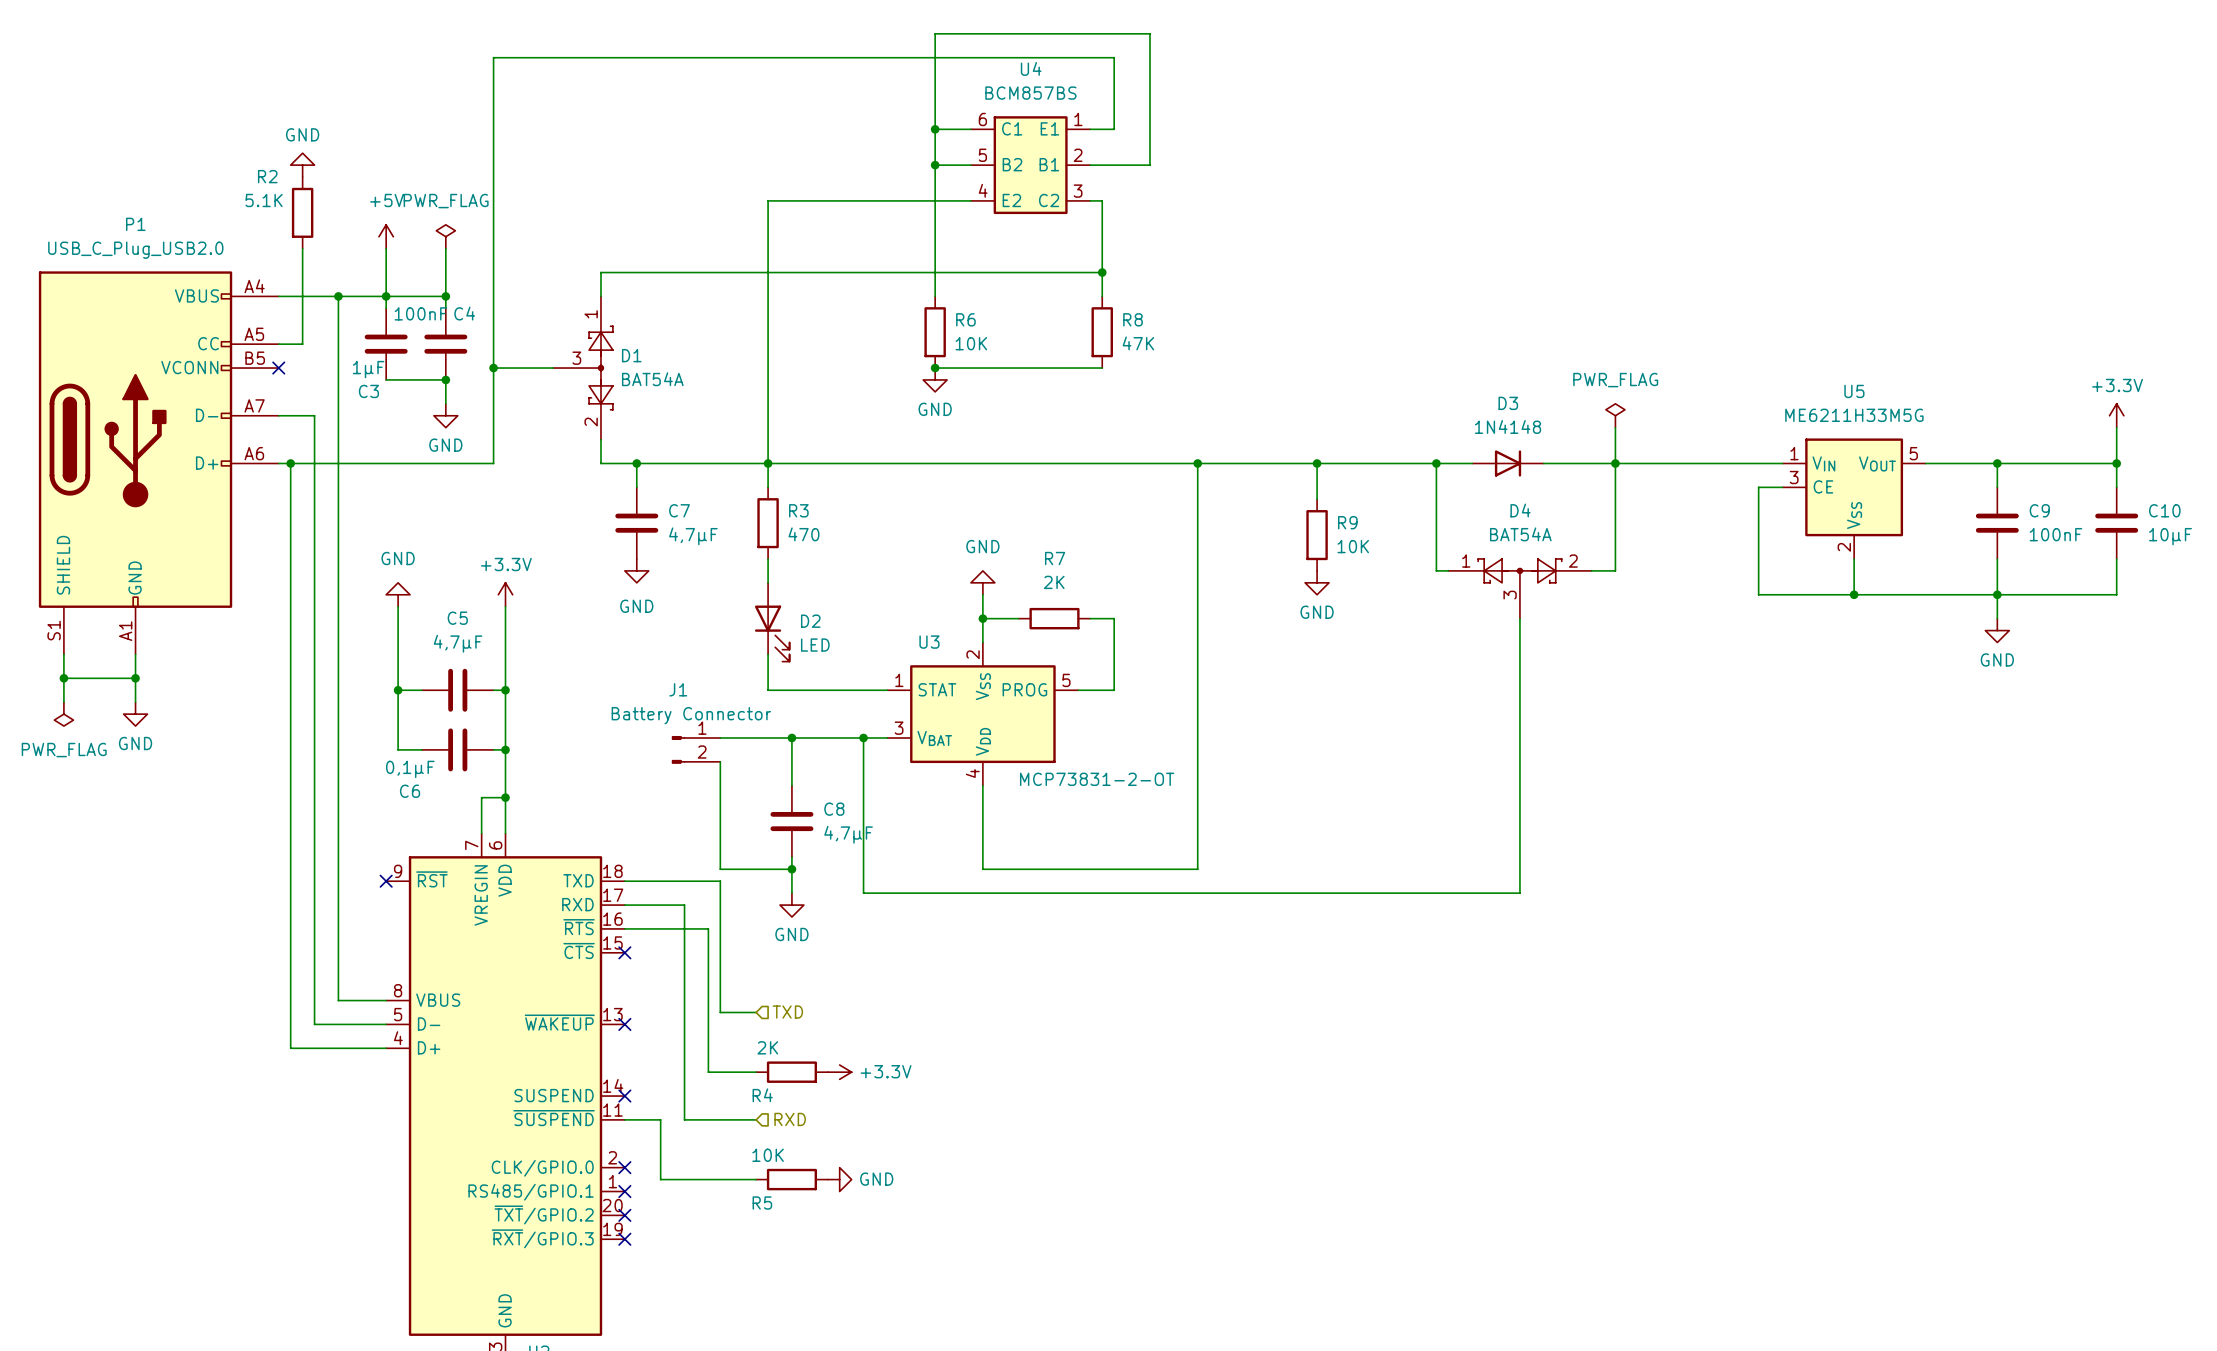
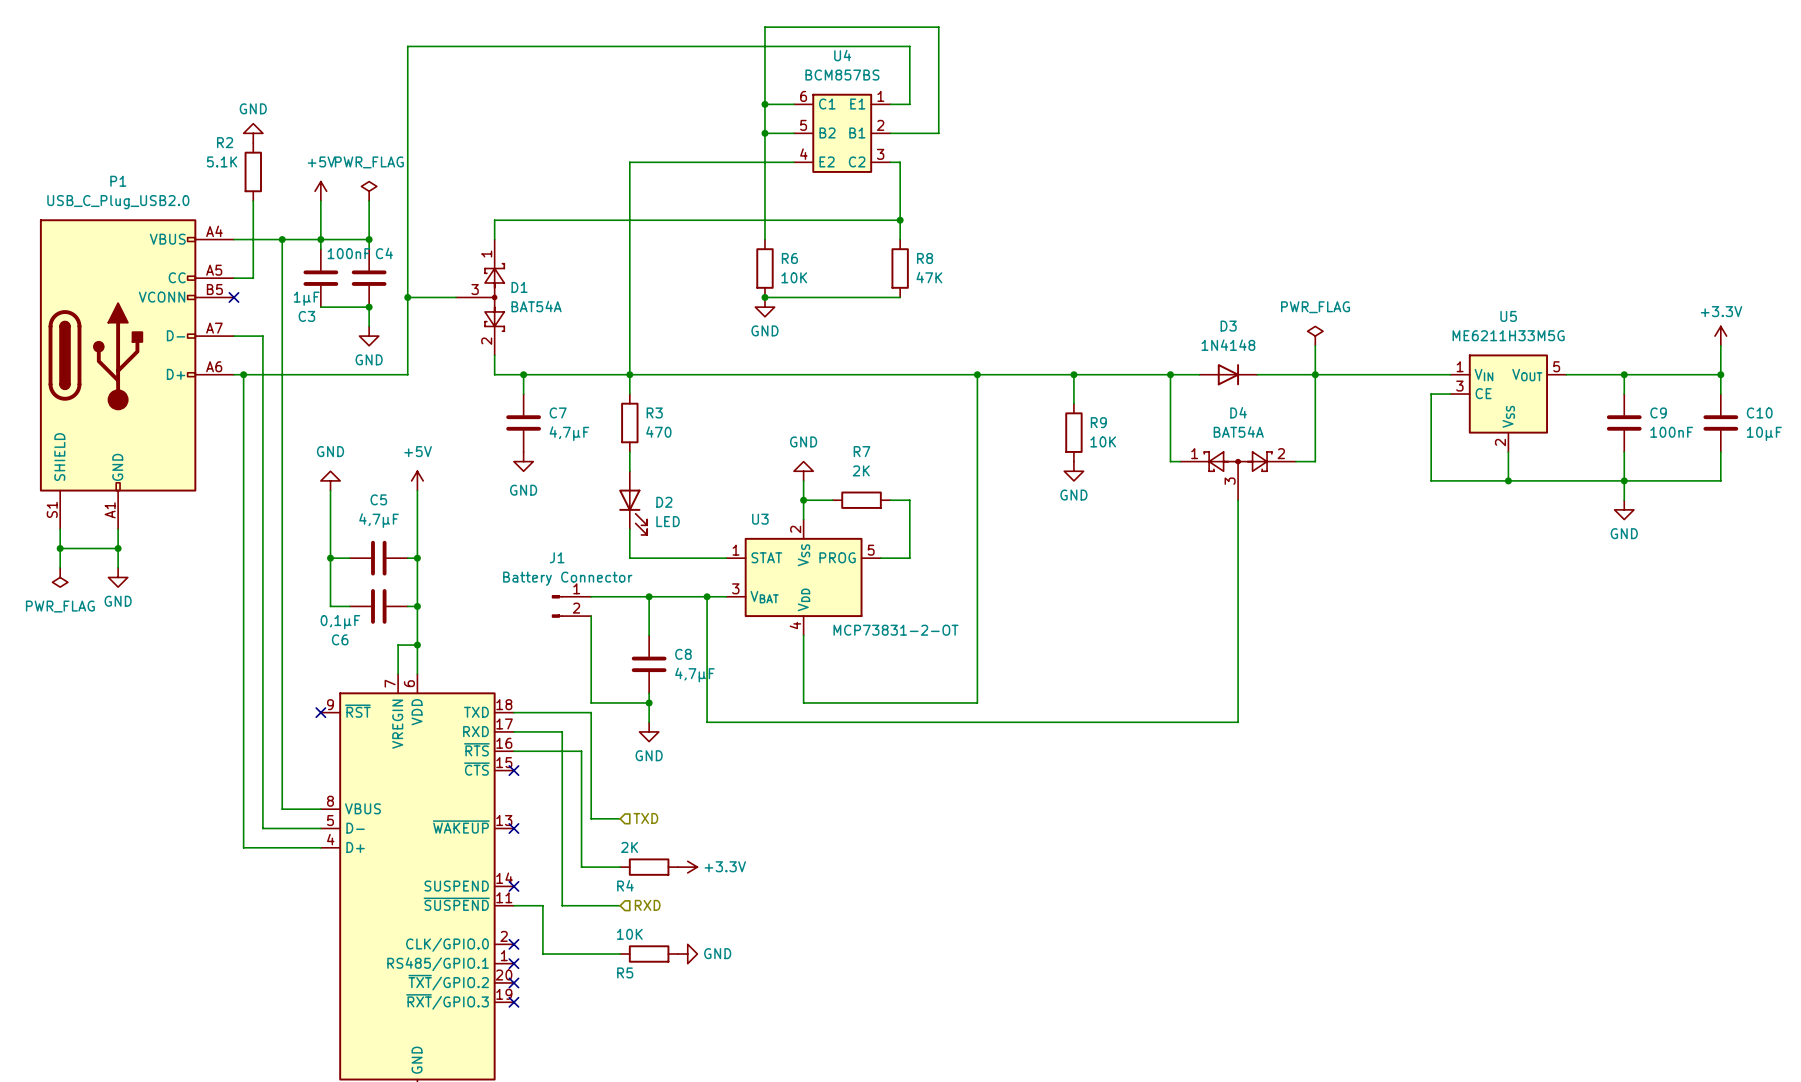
power symbol: +3.3V (505, 594) -> +5V (417, 480)

